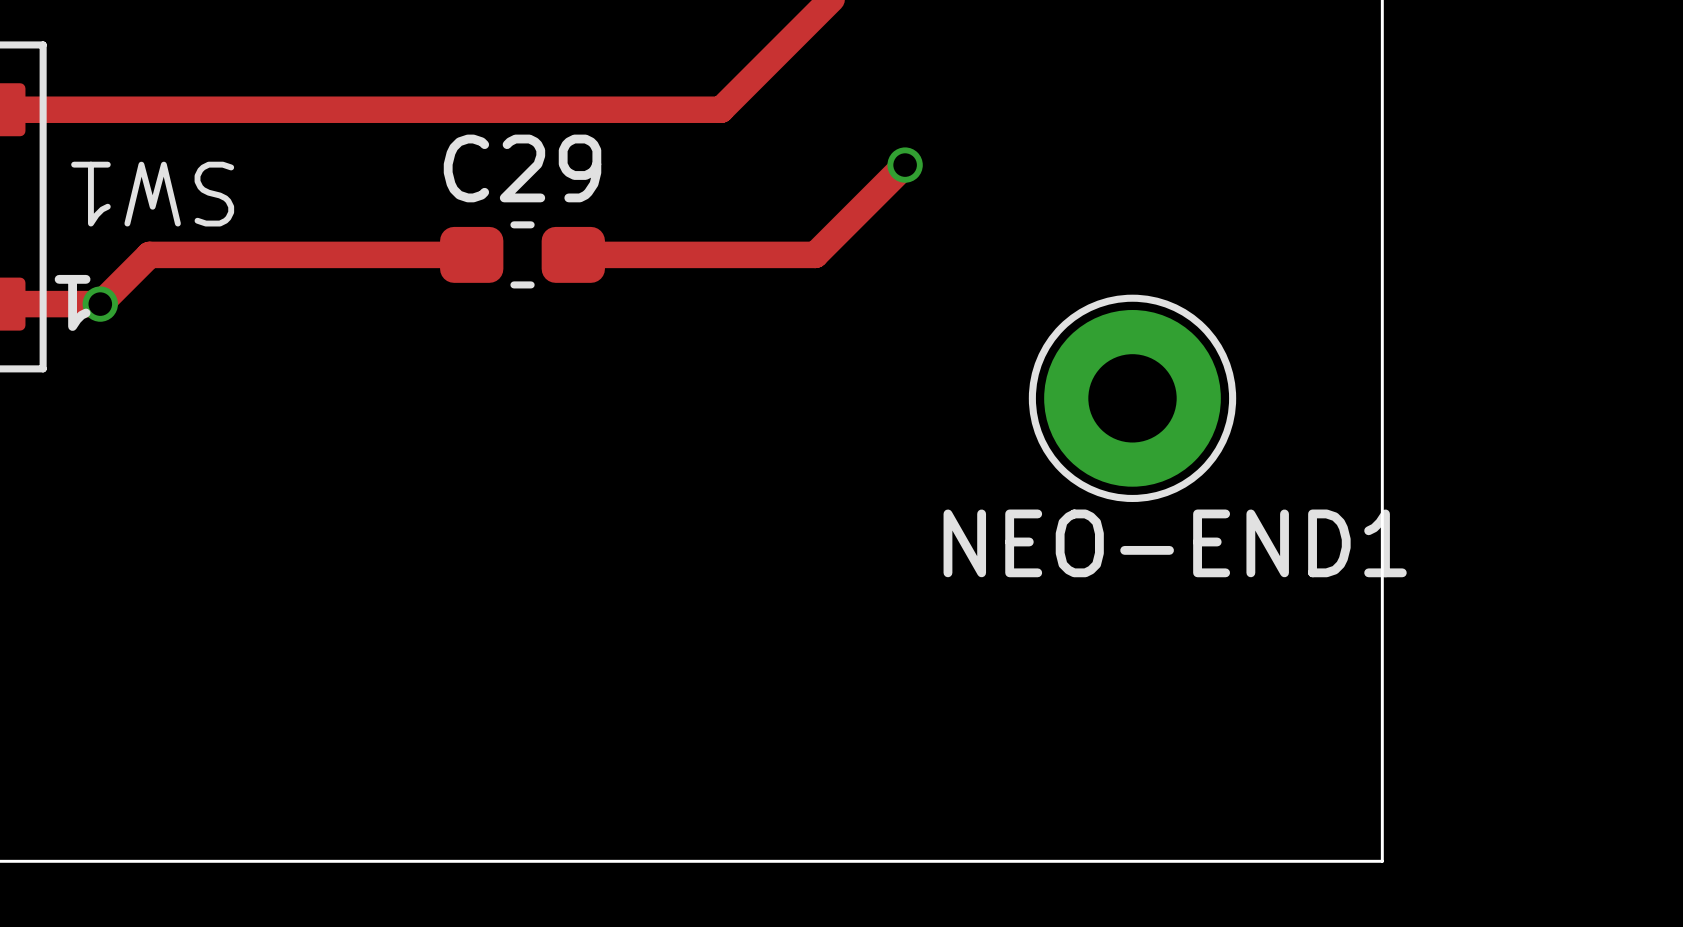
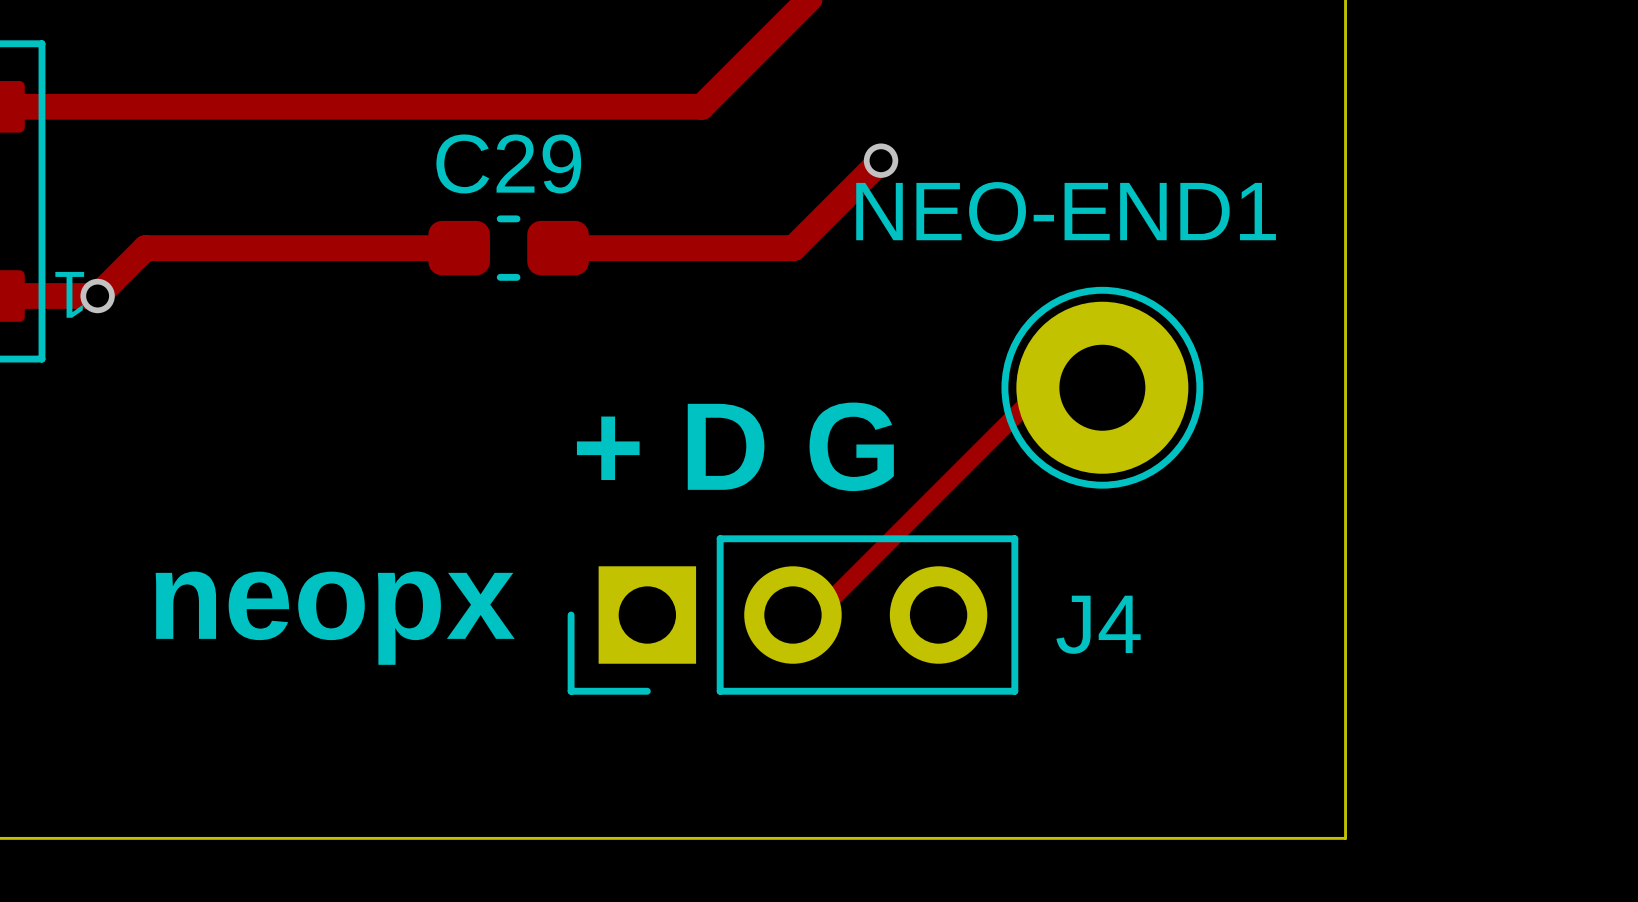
text: SW1 (152, 194) -> none
track: none -> (1102, 387) (1043, 387) (792, 637)
text: none -> + D G (735, 446)
NEO-END1 name position: NEO-END1 (1175, 543) -> NEO-END1 (1066, 211)
J4: none -> (792, 615)
text: none -> neopx (335, 618)

